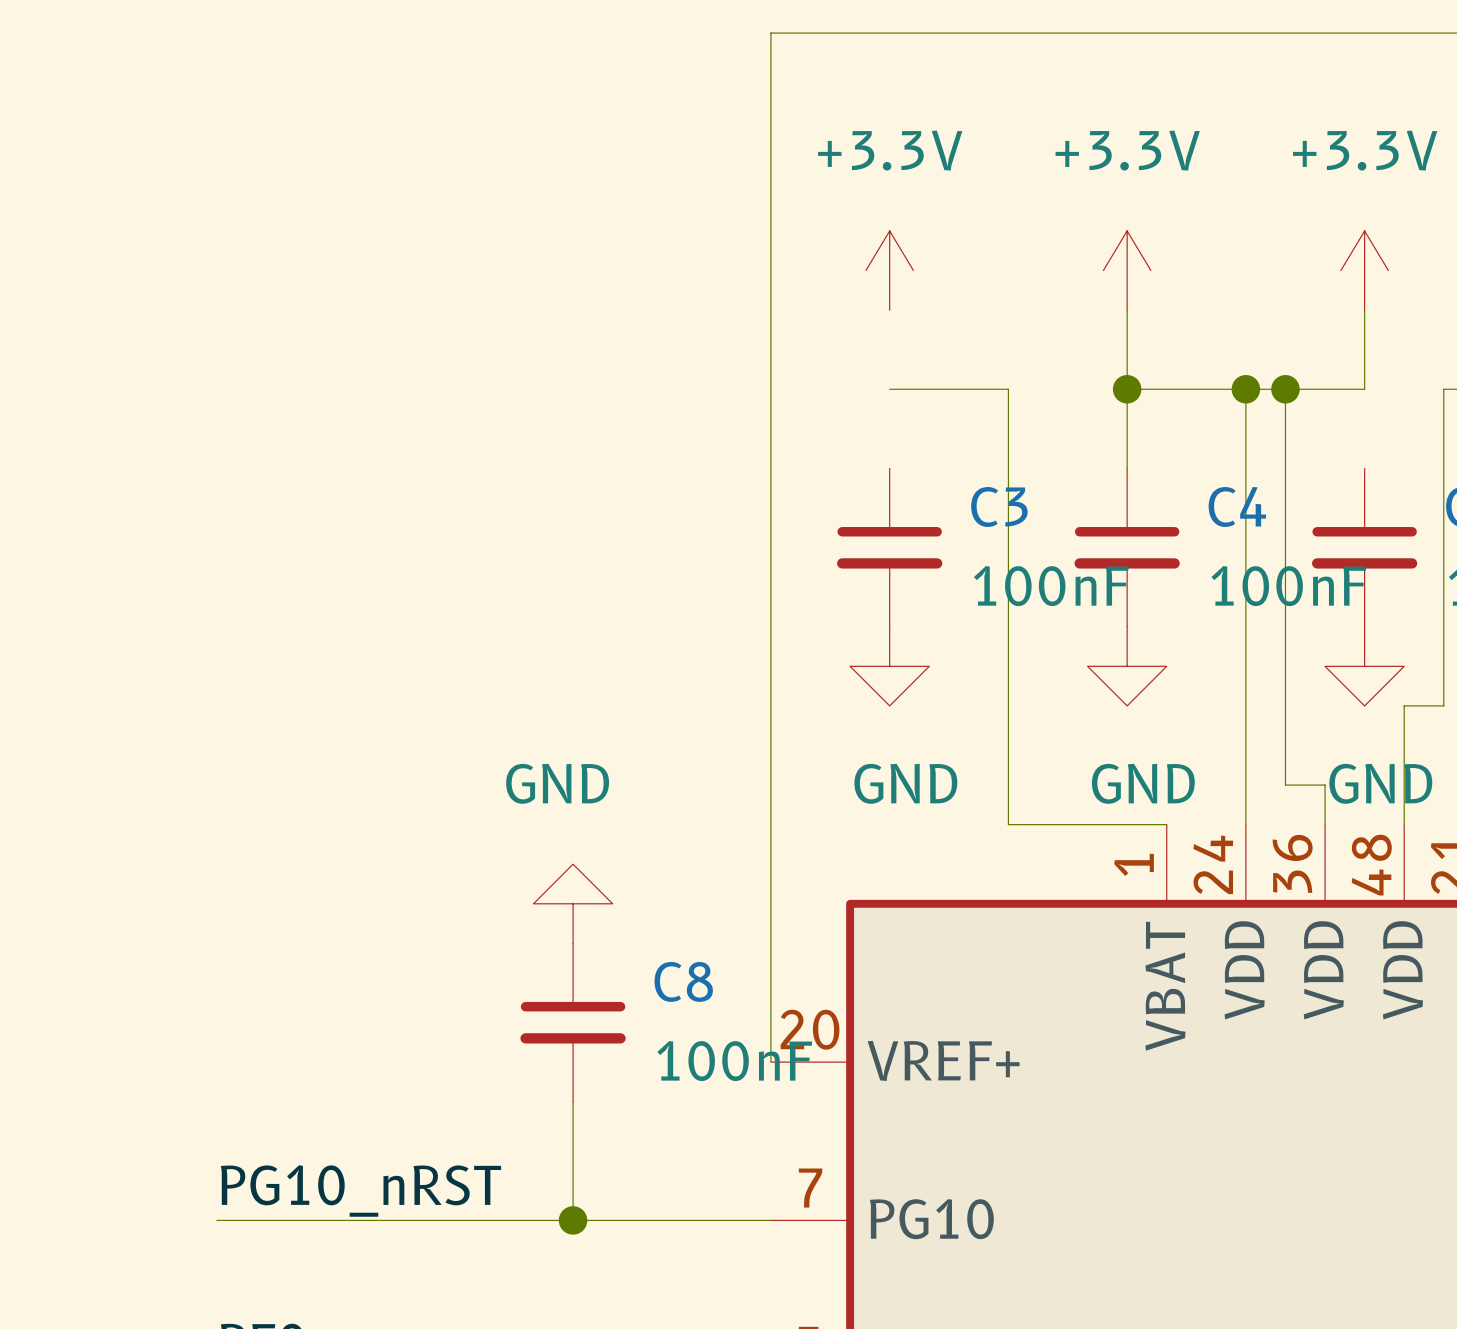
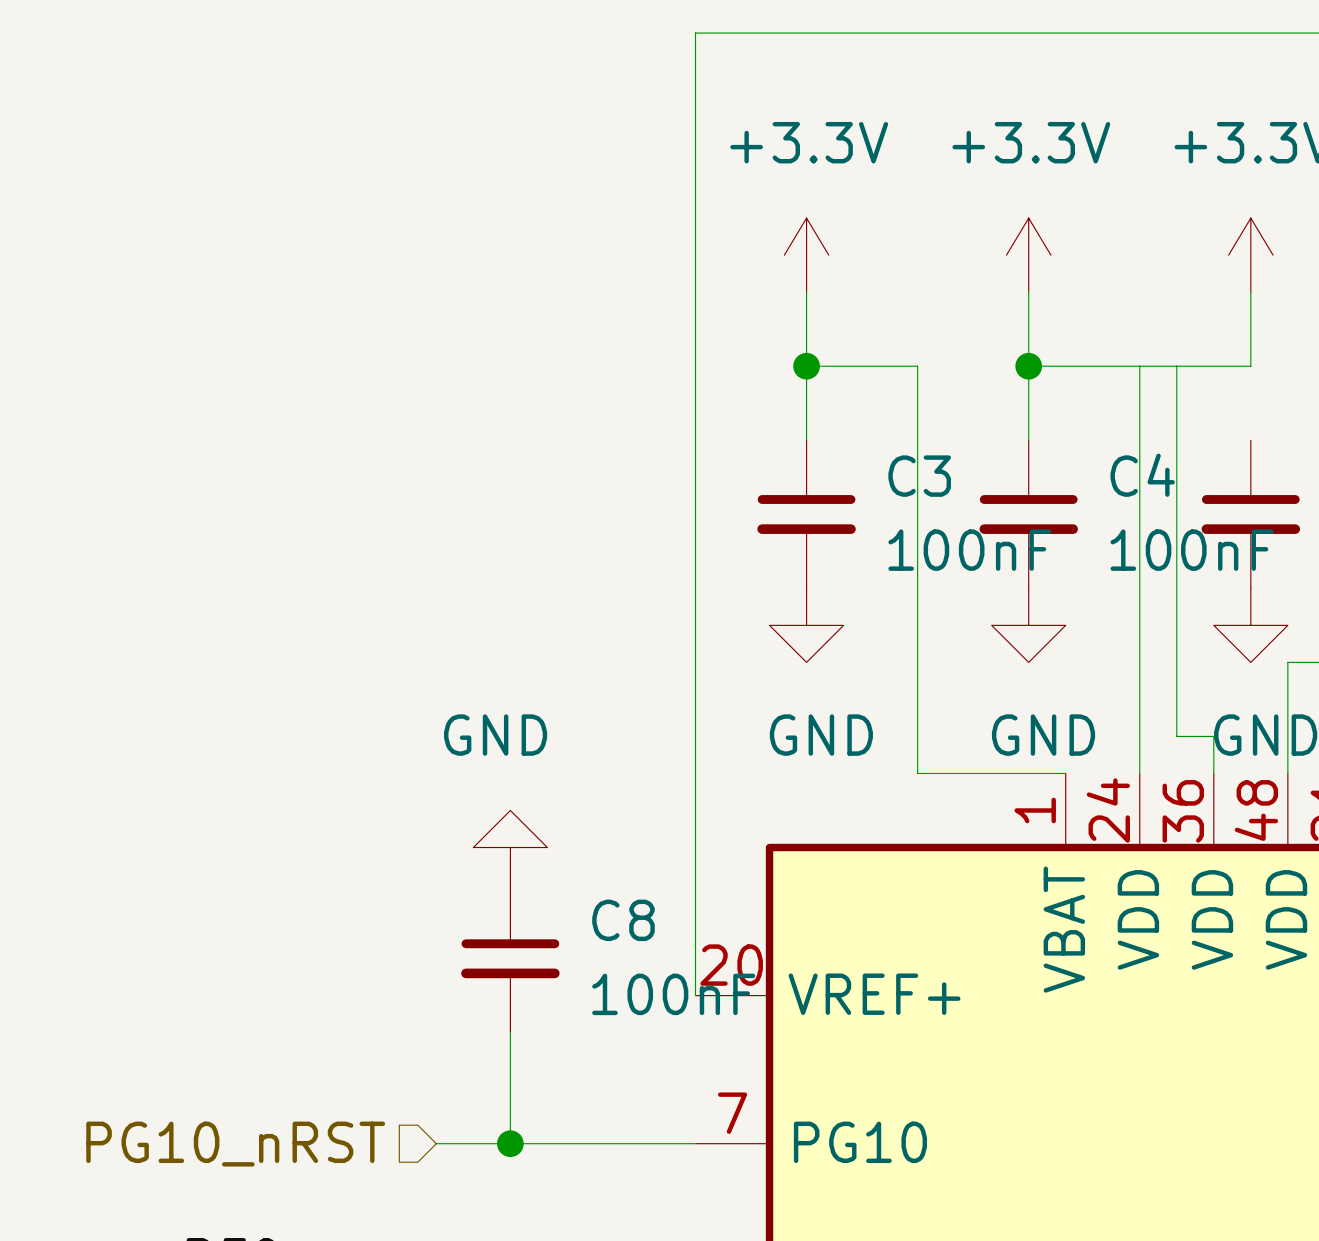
wire: none -> (806, 292) (806, 440)
junction: none -> (806, 366)
junction: (1245, 389) -> none
junction: (1285, 389) -> none
label: PG10_nRST (360, 1191) -> none
wire: (216, 1220) (493, 1220) -> none
hierarchical label: none -> PG10_nRST (235, 1144)

